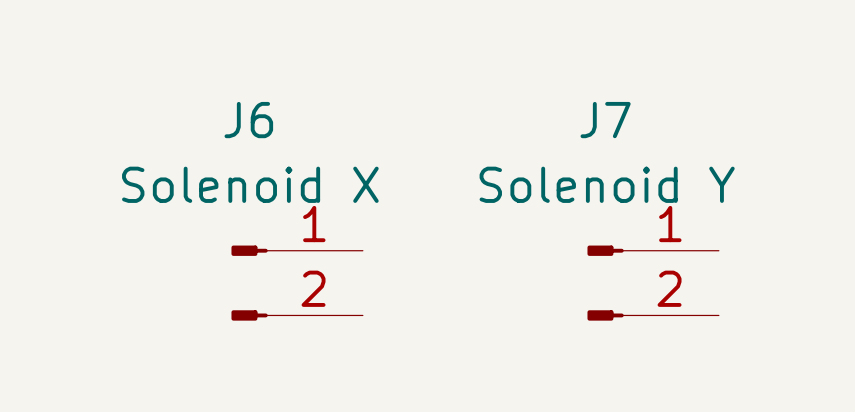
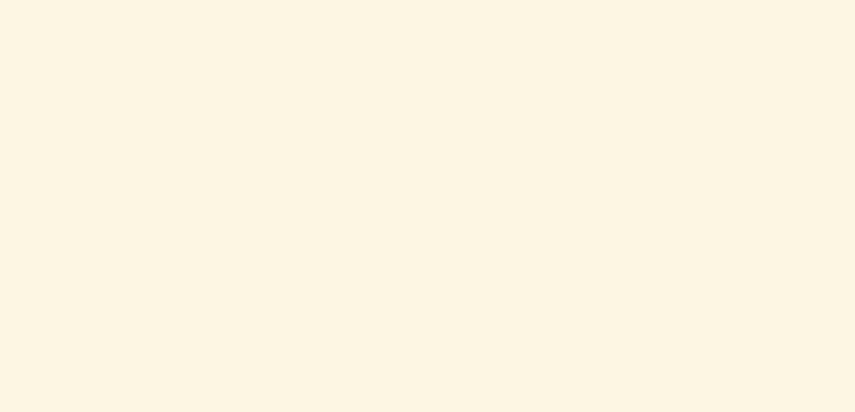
J6: Solenoid X (297, 283) -> none
J7: Solenoid Y (653, 283) -> none

